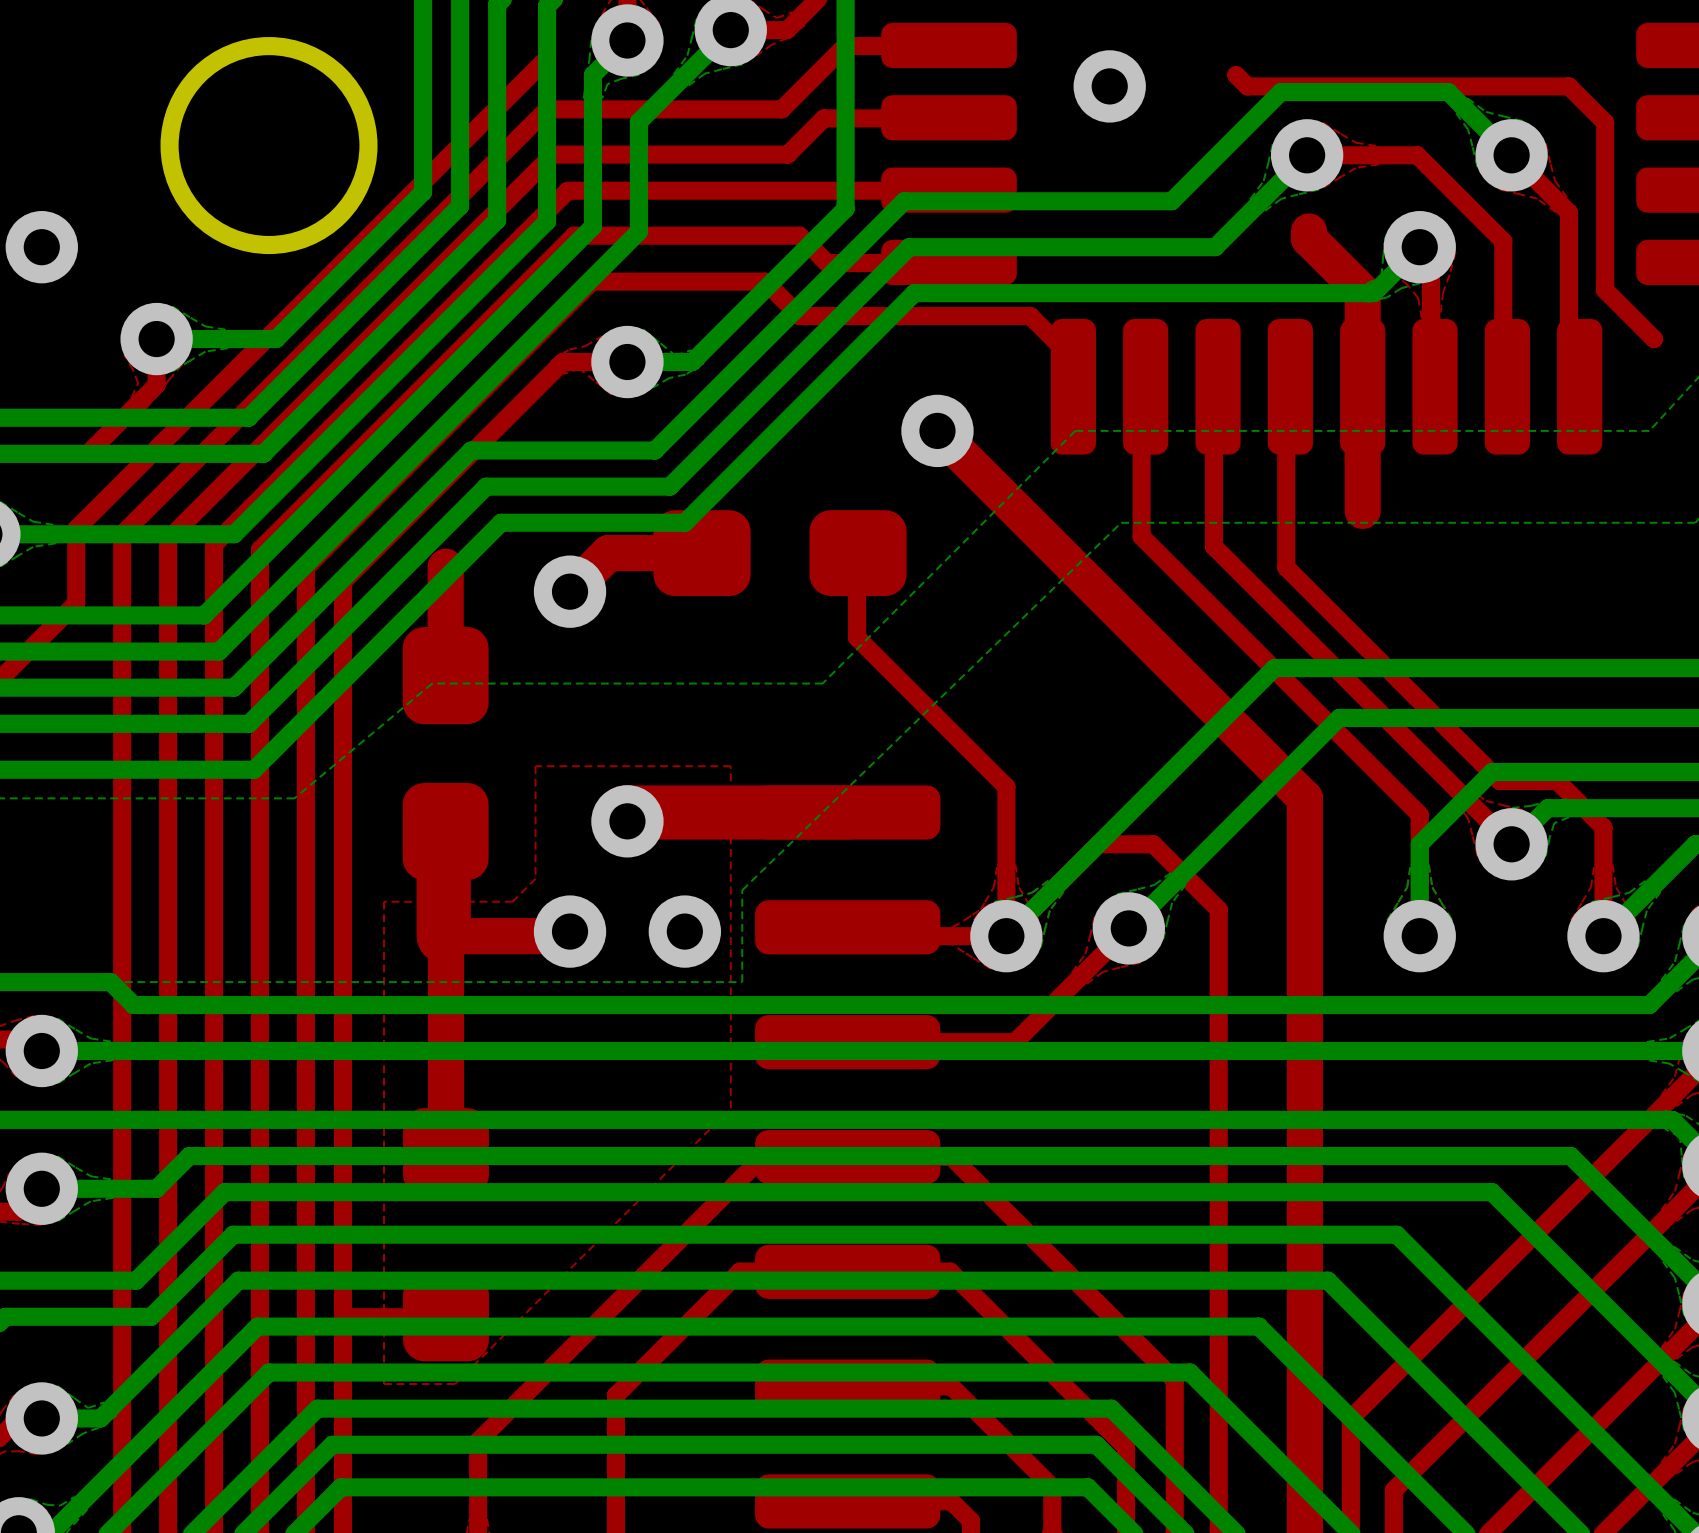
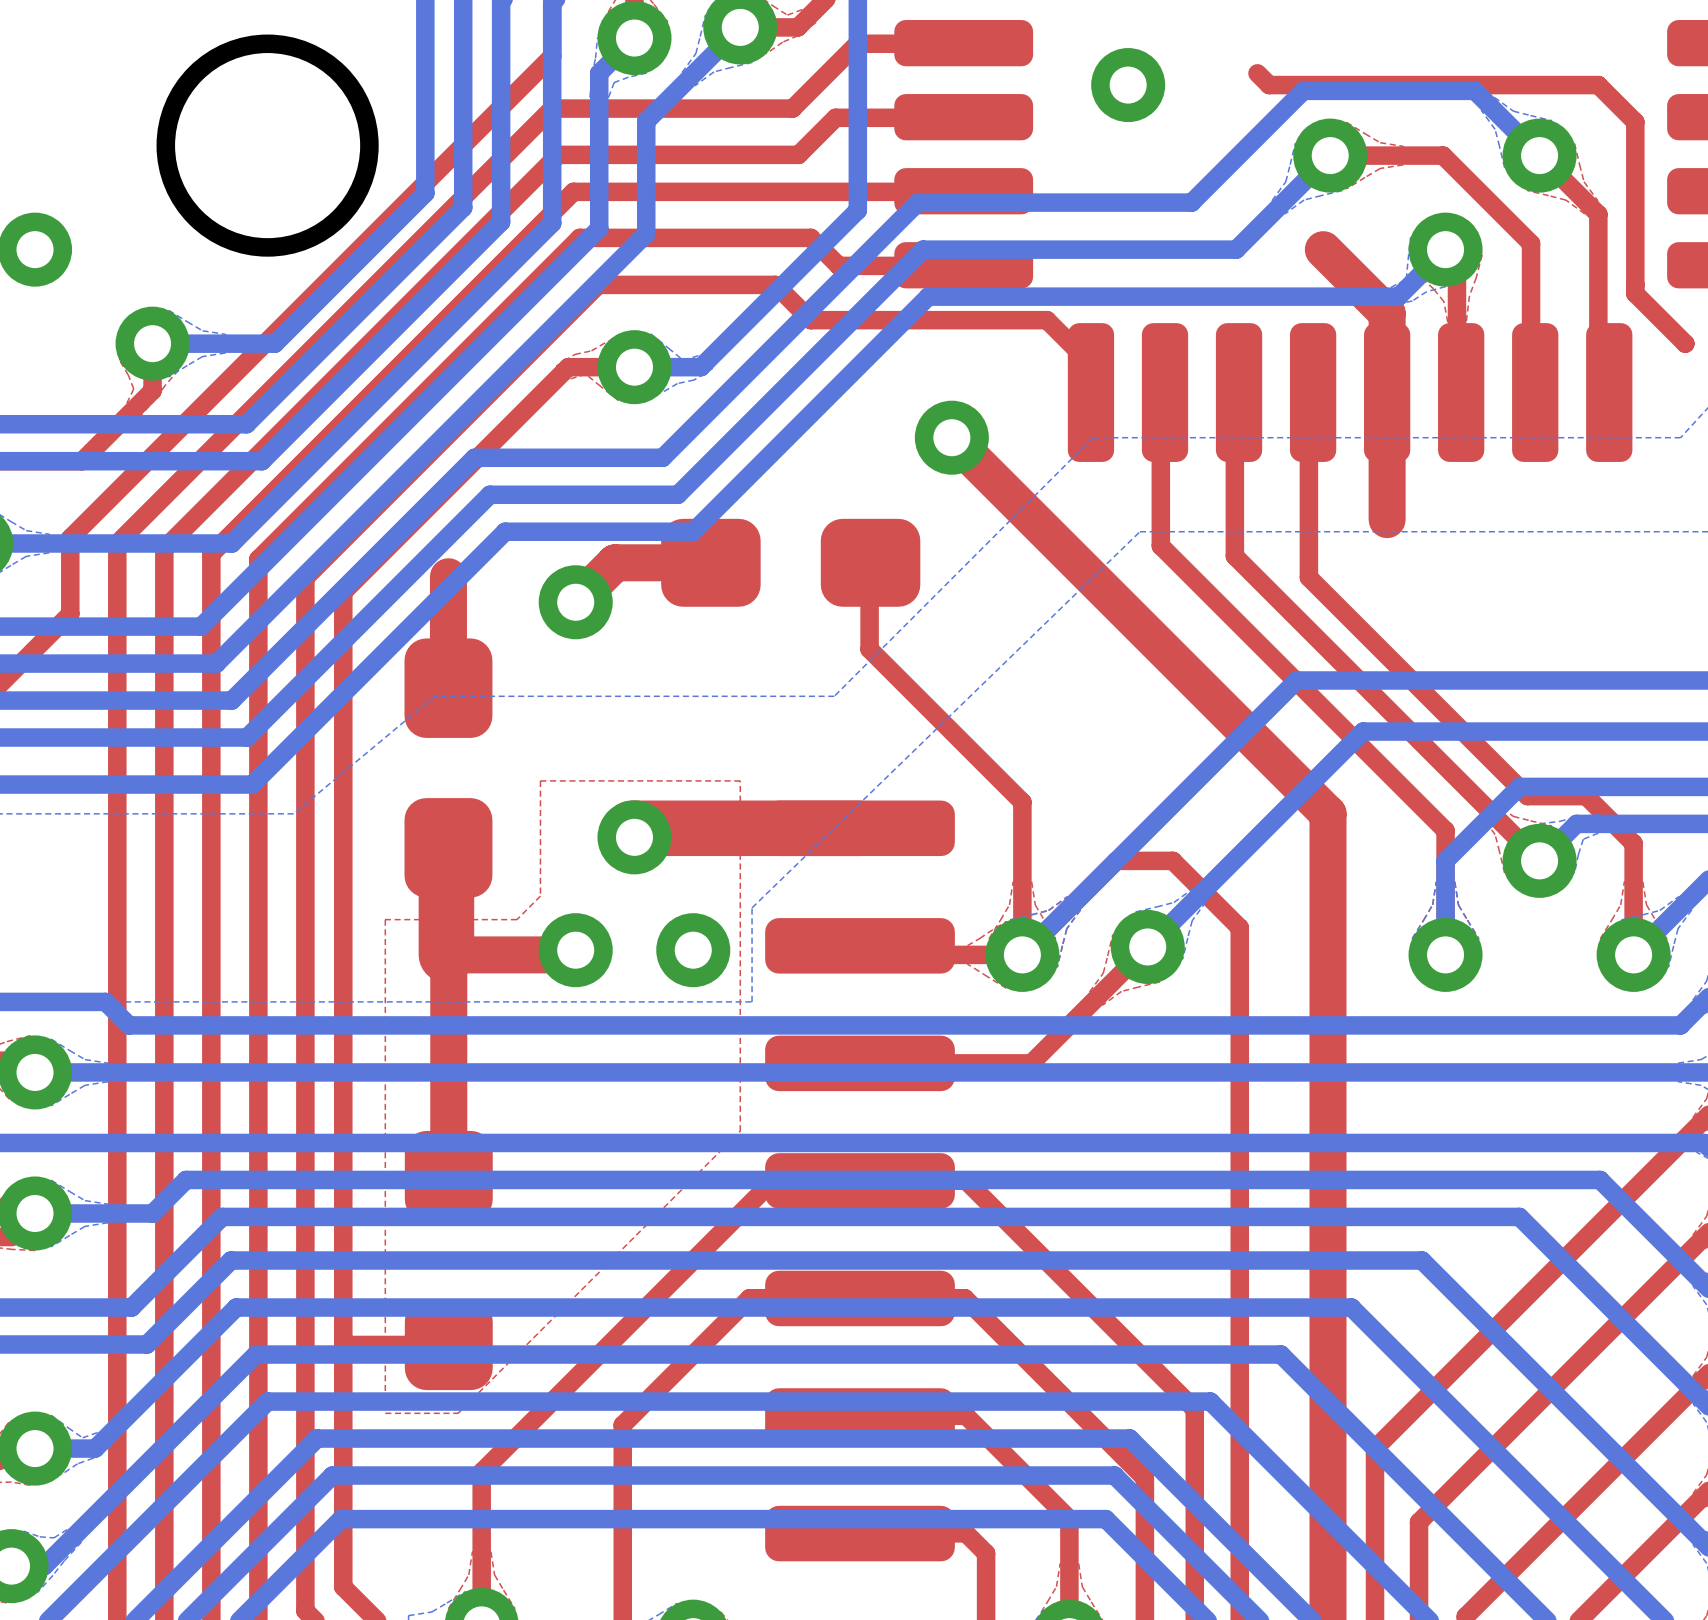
top track: (1309, 231) (1309, 238) (1362, 292) (1362, 309) -> (1323, 249) (1387, 313)

